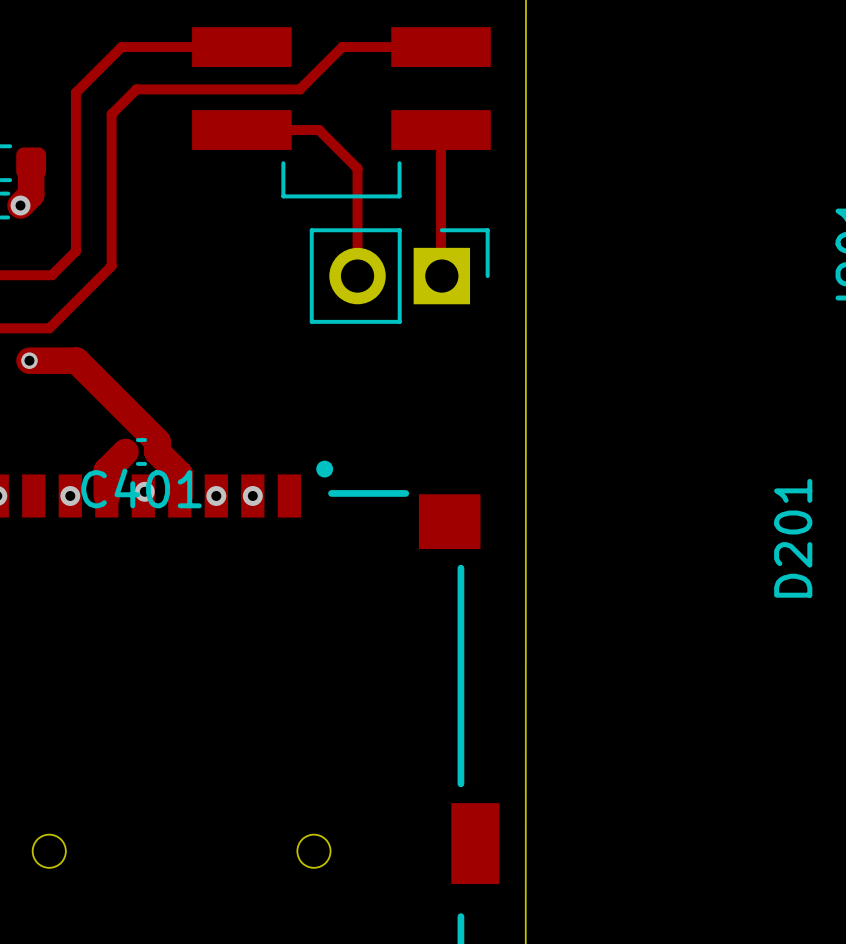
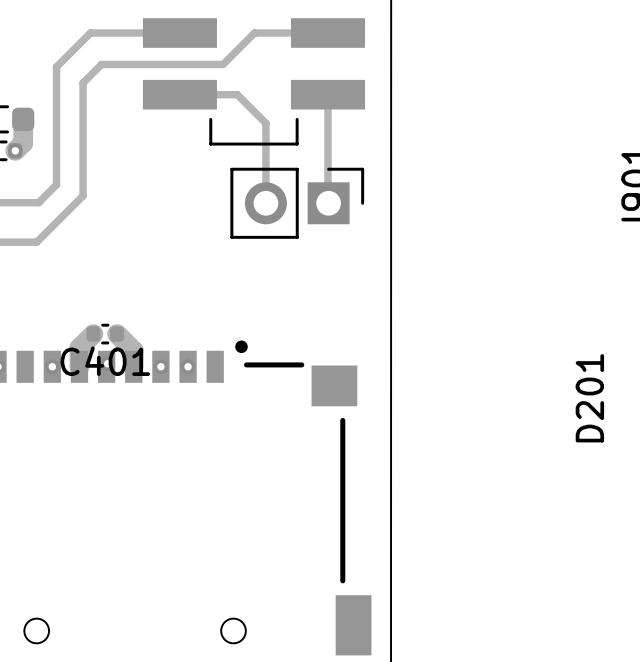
track: (29, 360) (76, 360) (157, 441) (157, 451) -> none
via: (29, 360) -> none

